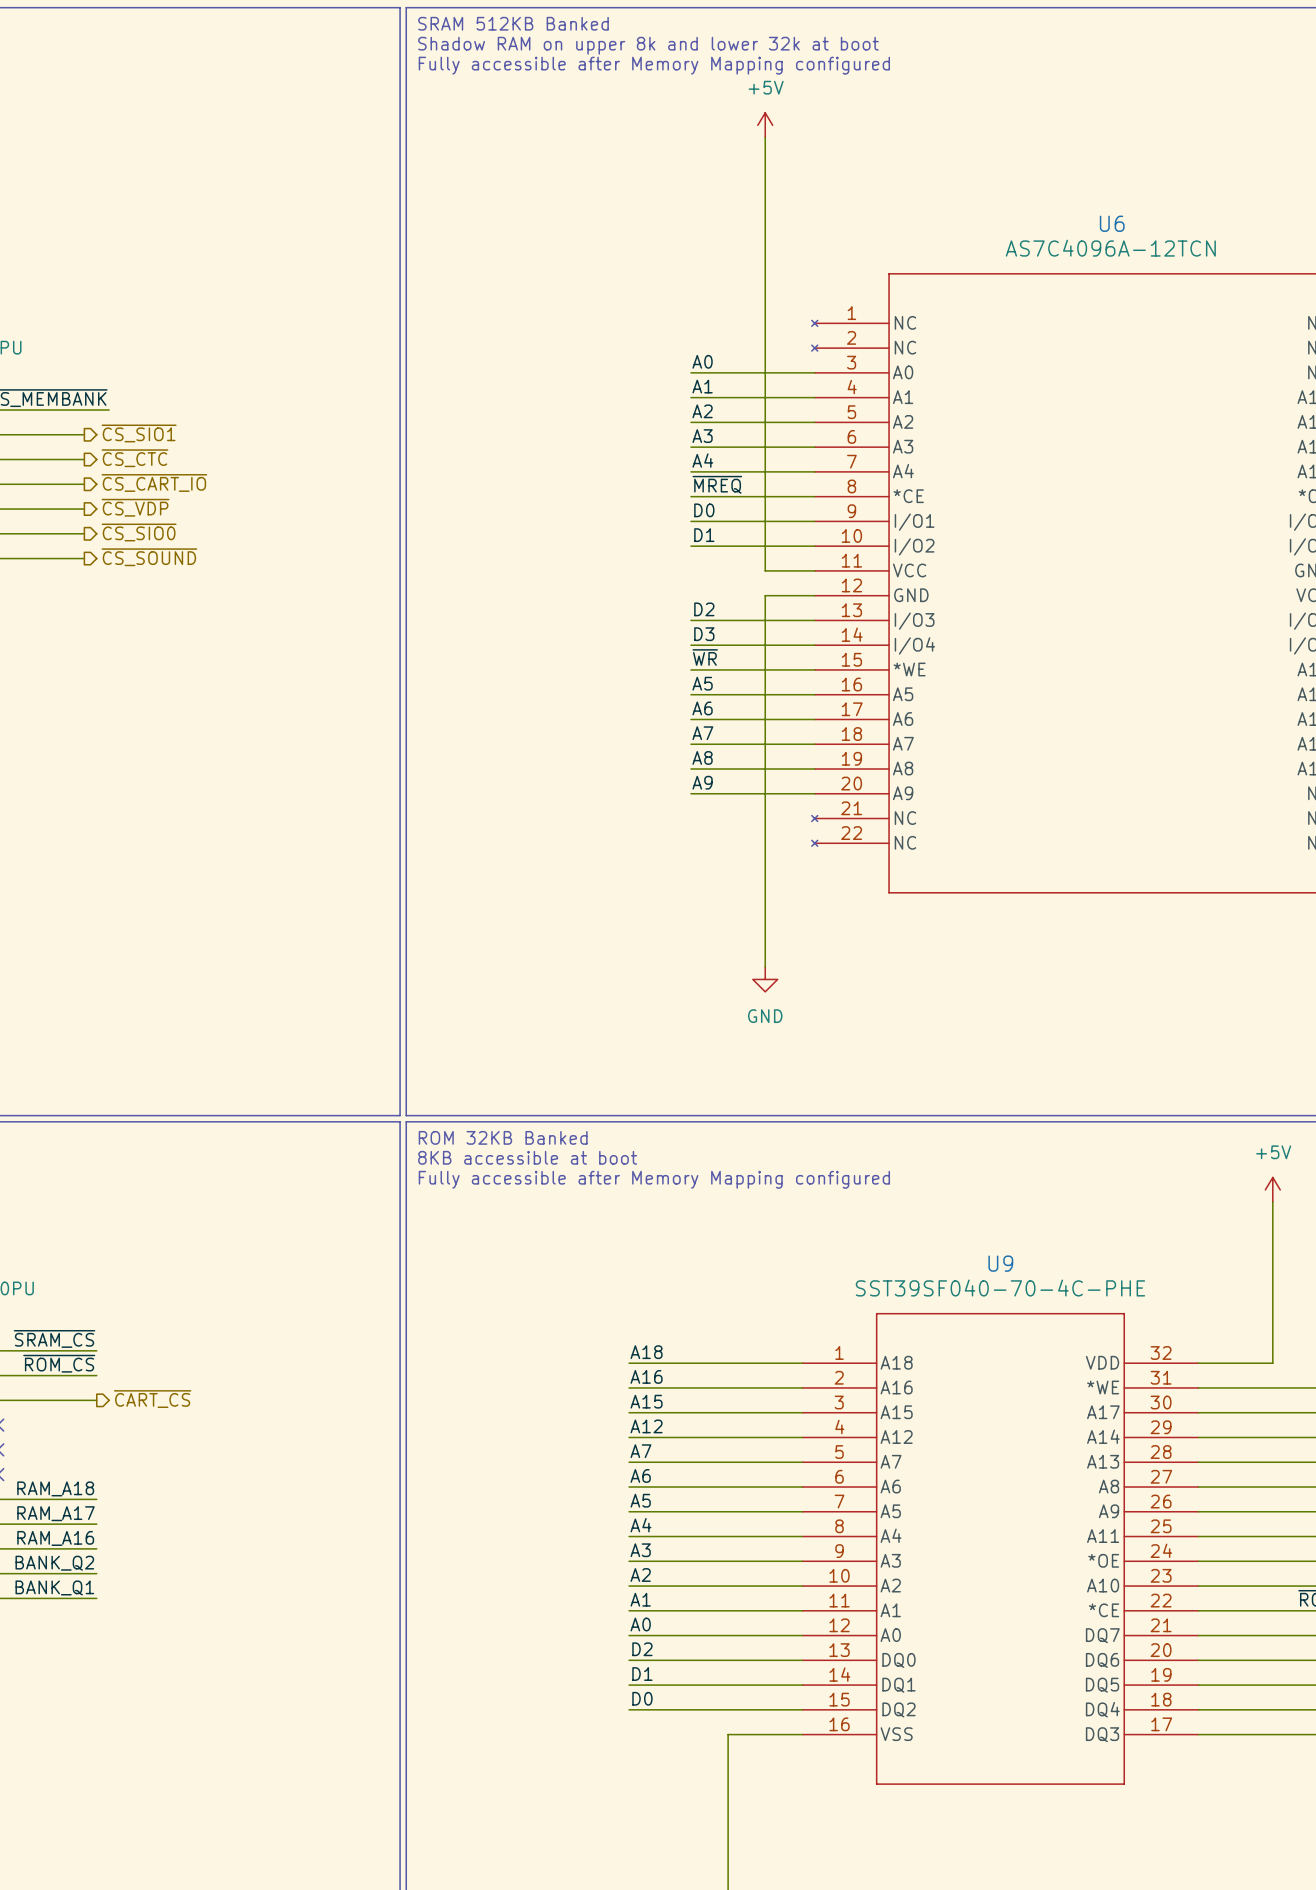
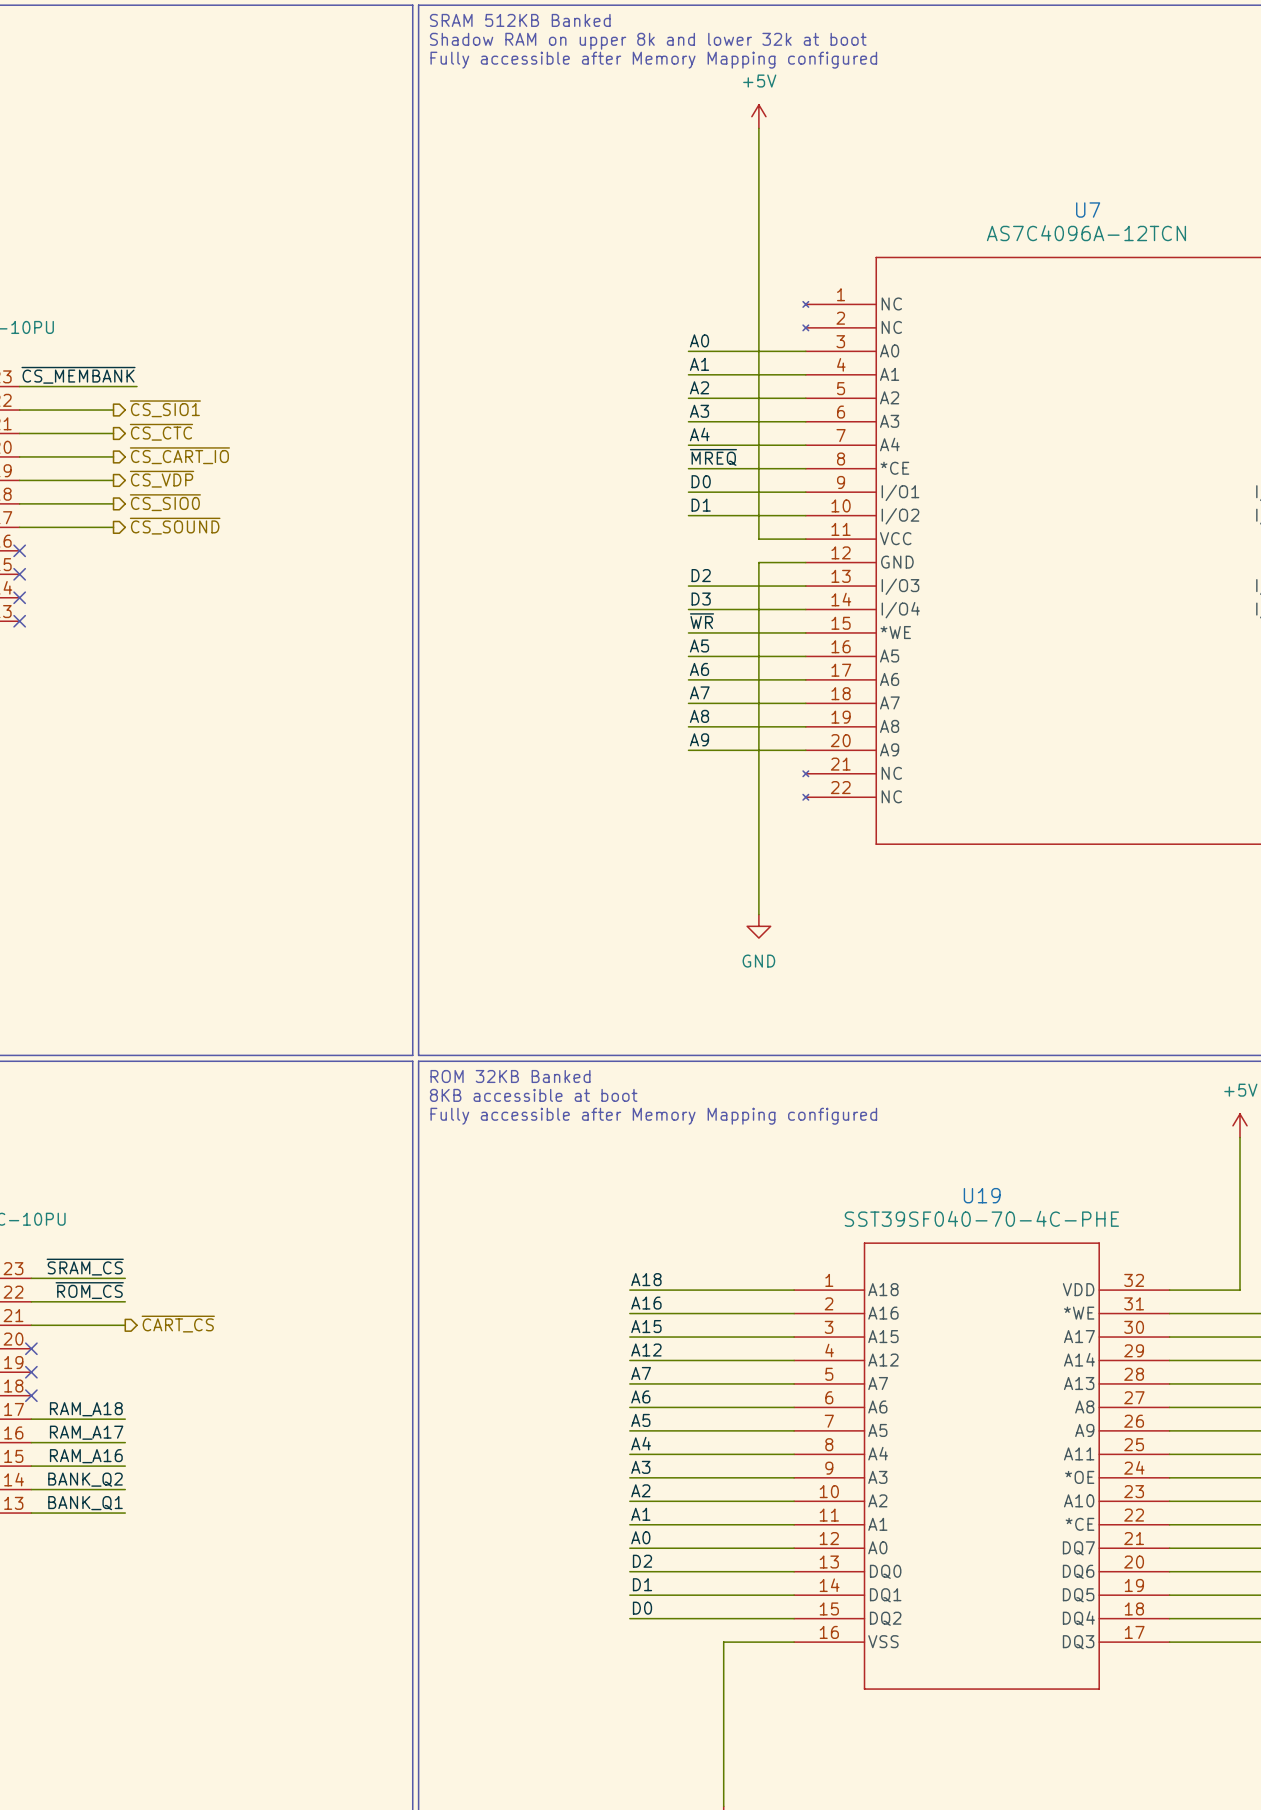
U6 name: U6 (1112, 223) -> U7 (1088, 210)
U9 name: U9 (1000, 1263) -> U19 (982, 1195)

